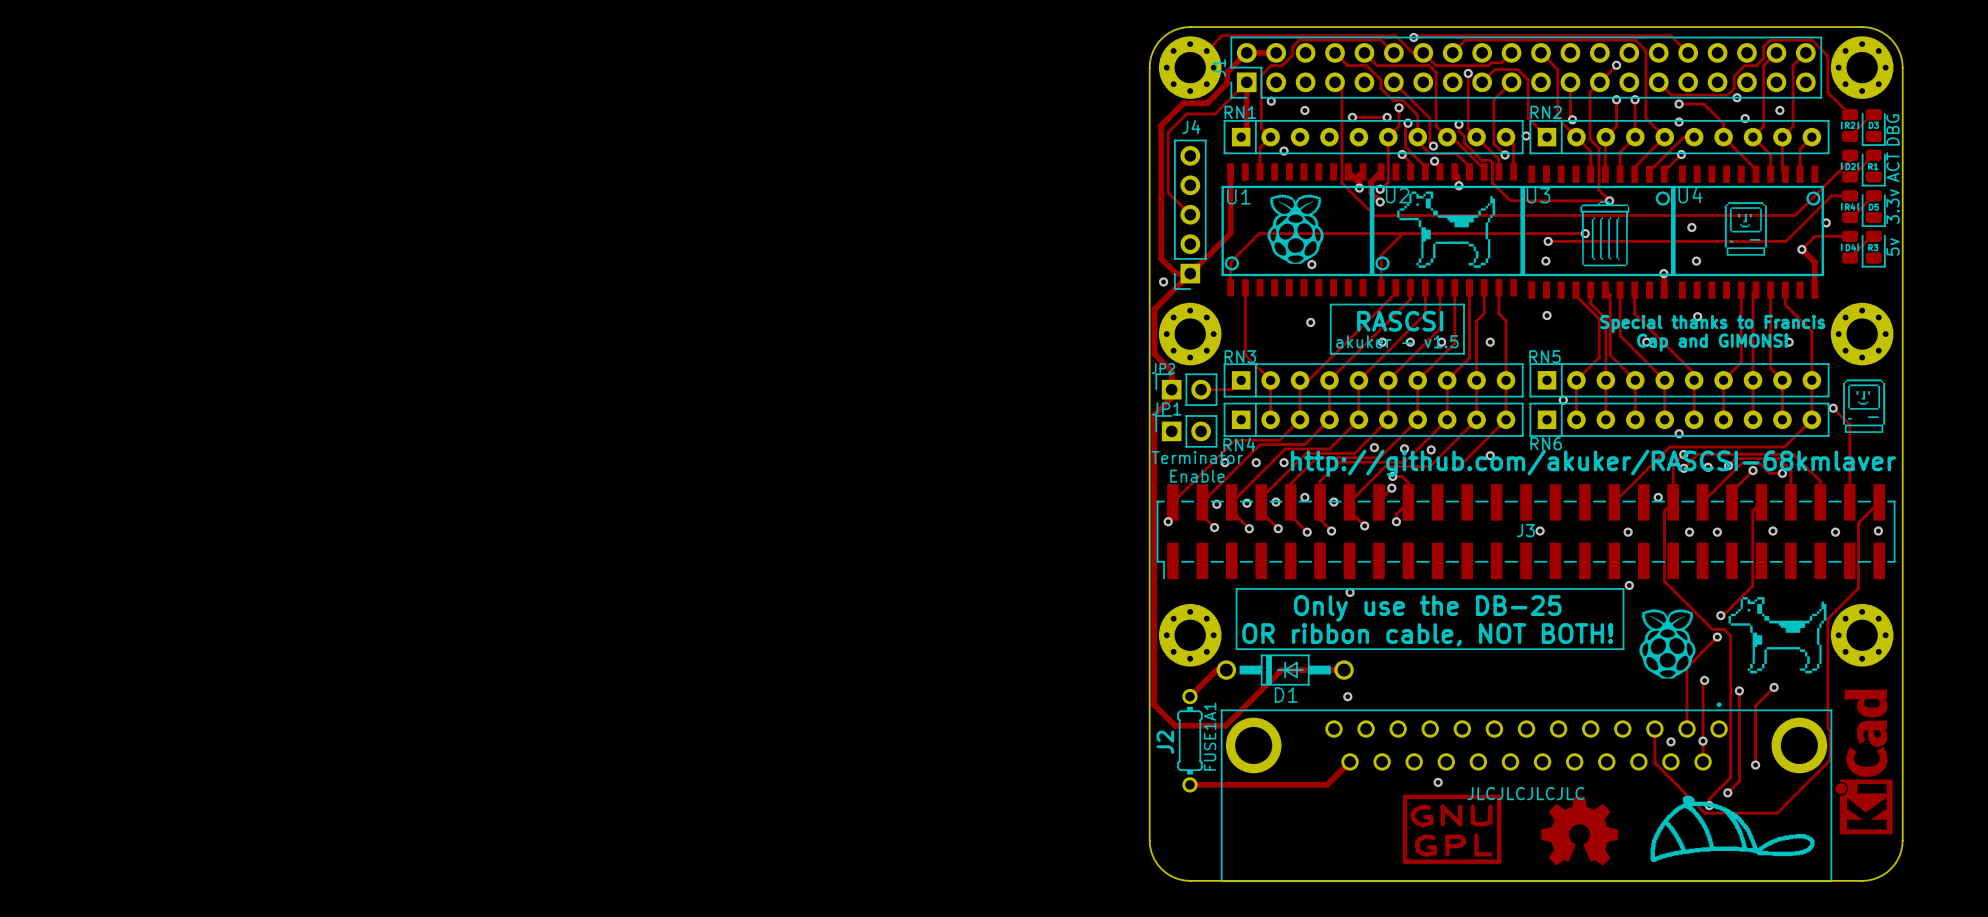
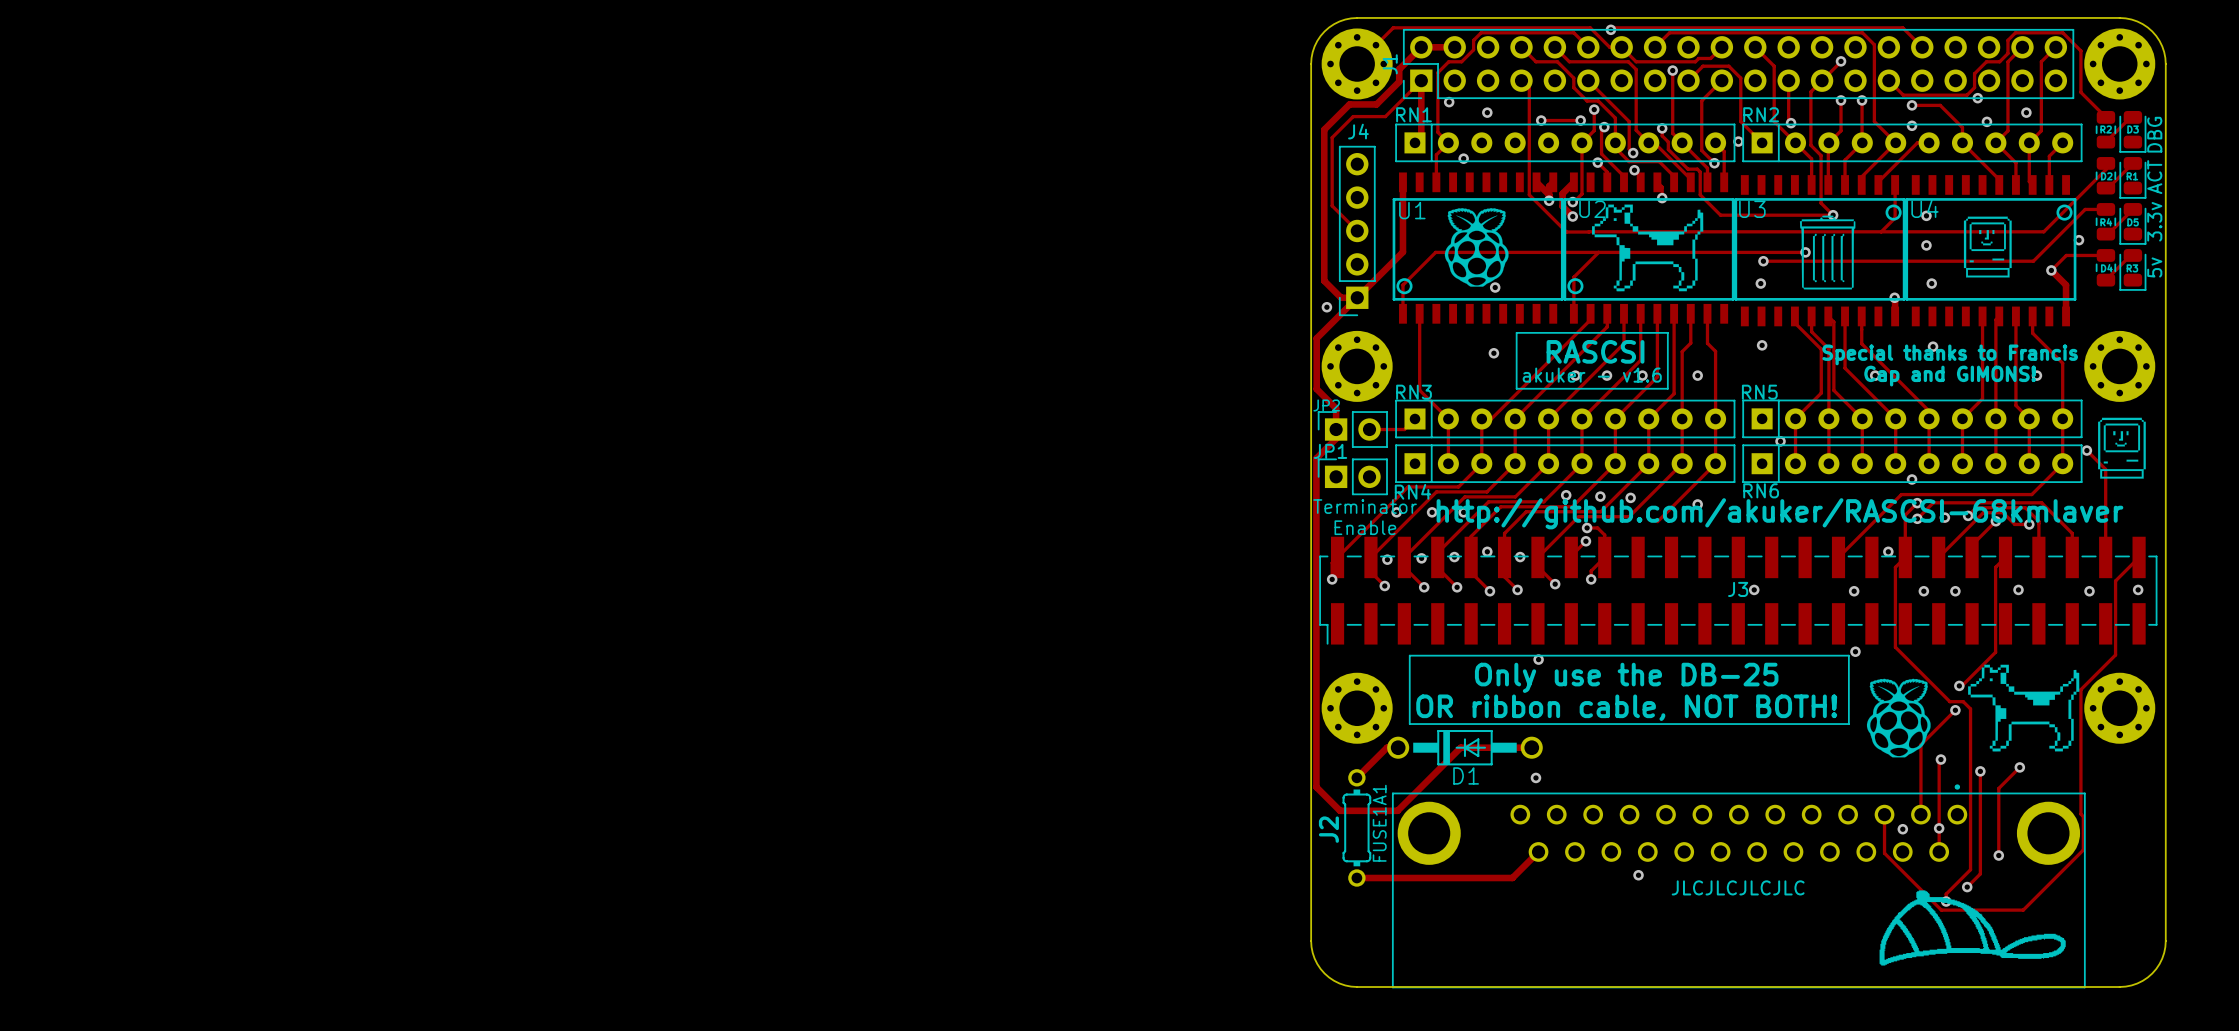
track: (1681, 154) (1664, 171) (1664, 174) -> (1881, 231) (1895, 217) (1895, 184)
via position: (1681, 154) -> (1926, 215)
text: akuker - v1.5 (1397, 341) -> akuker - v1.6 (1592, 375)
text position: http://github.com/akuker/RASCSI-68kmlaver (1593, 463) -> http://github.com/akuker/RASCSI-68kmlaver (1779, 513)
drawing: [1835, 688, 1893, 835] -> none
drawing: [1402, 794, 1502, 864] -> none
drawing: [1541, 796, 1619, 866] -> none

